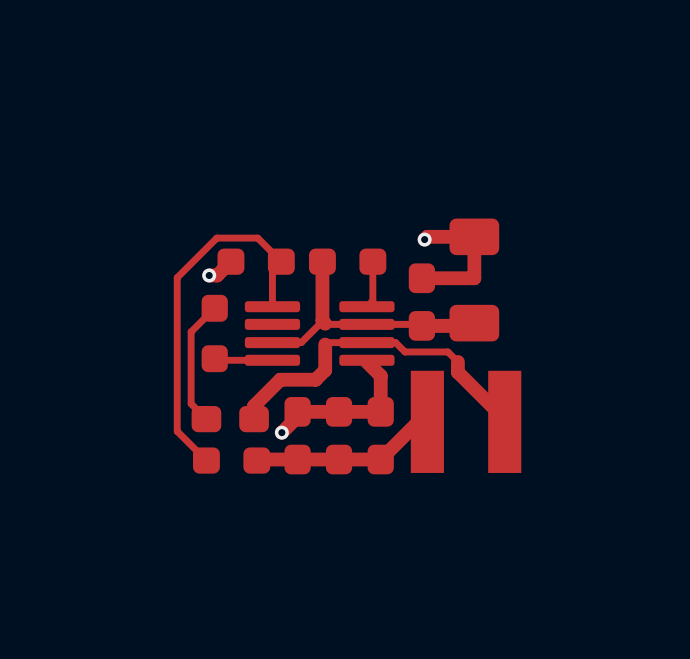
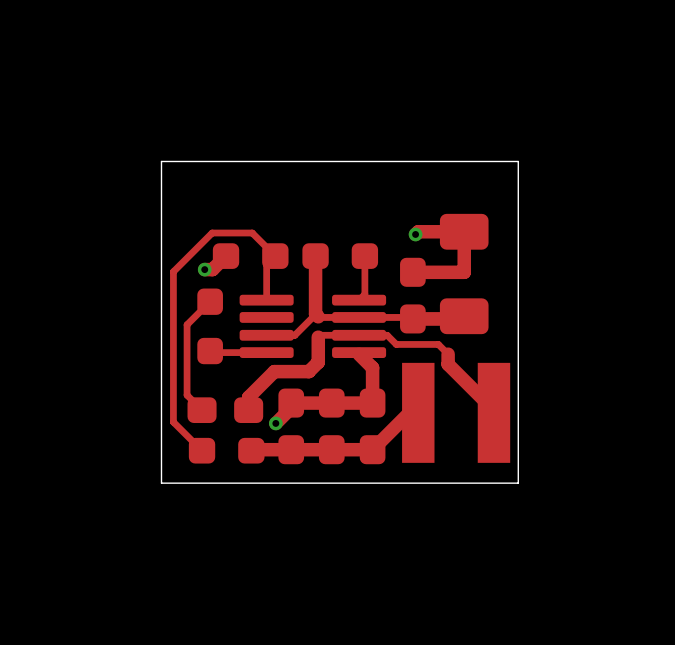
board edge: none -> (518, 161) (161, 161) (161, 483) (518, 483) (518, 161)

